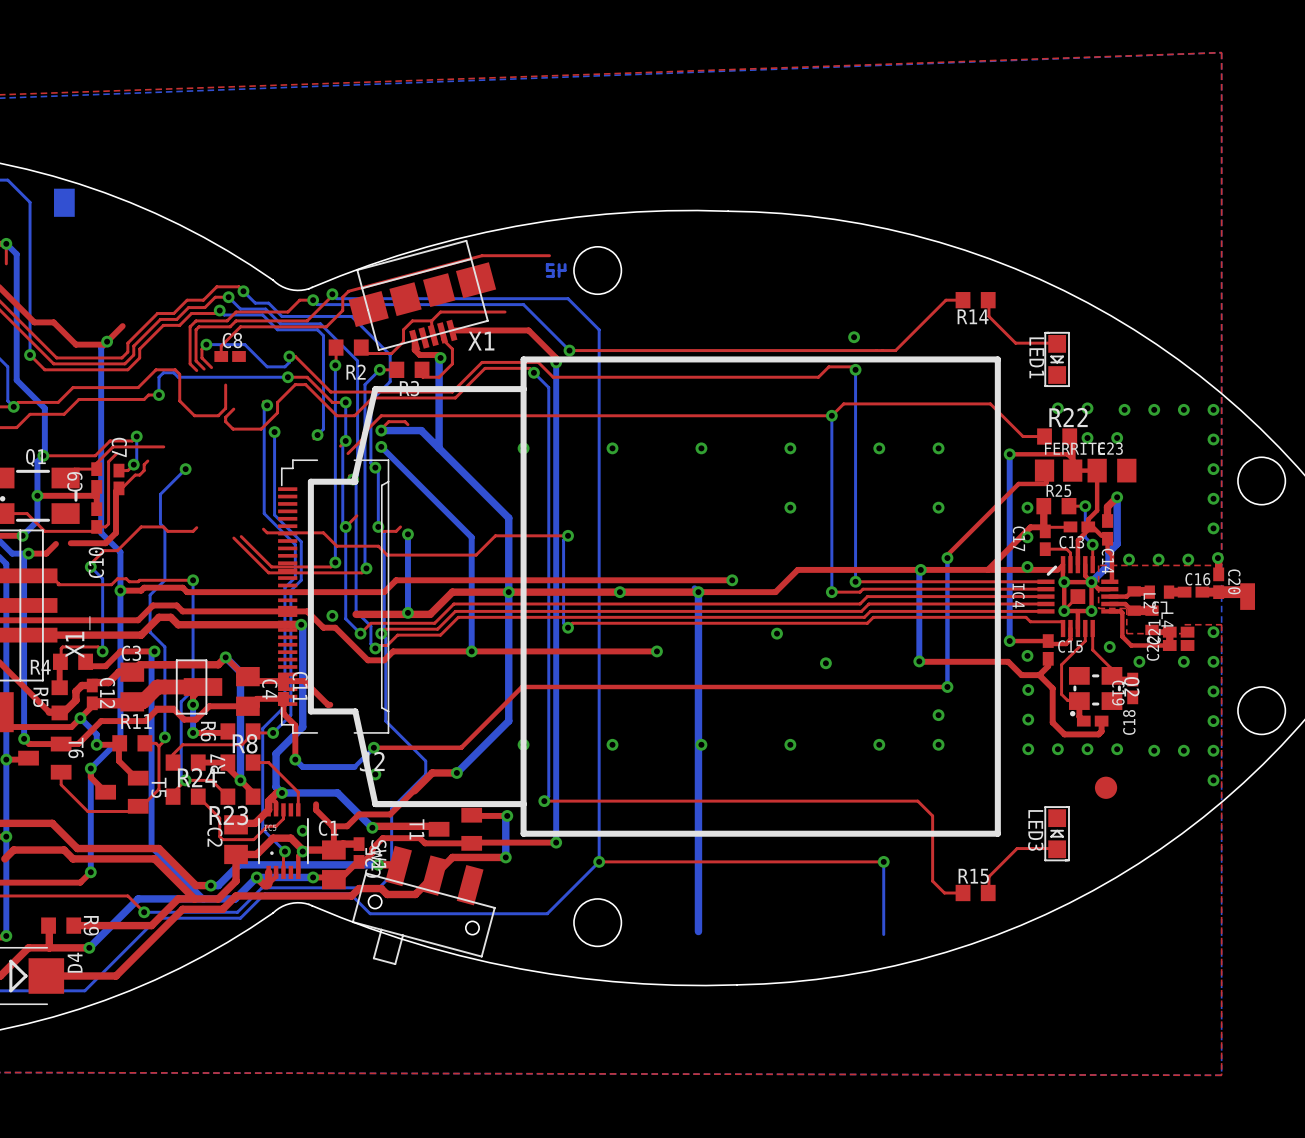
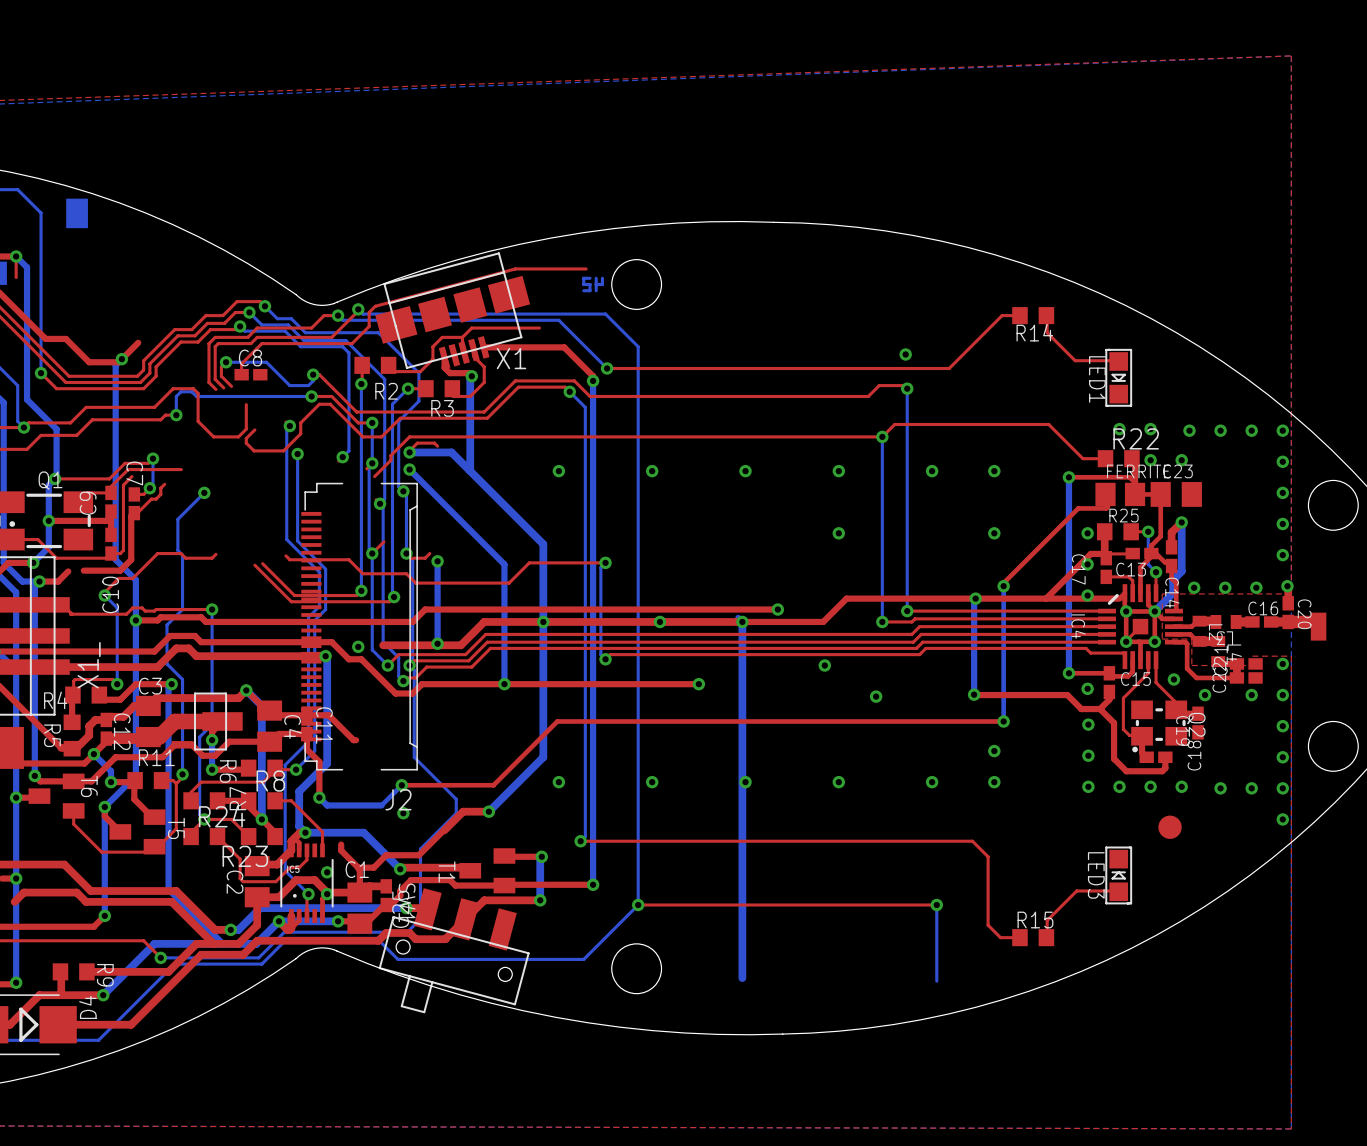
line: (523, 359) (997, 359) (997, 833) (523, 833) (523, 359) -> none
line: (523, 389) (375, 389) (354, 481) -> none
line: (355, 481) (310, 481) (310, 711) (355, 711) (375, 804) (523, 804) -> none

